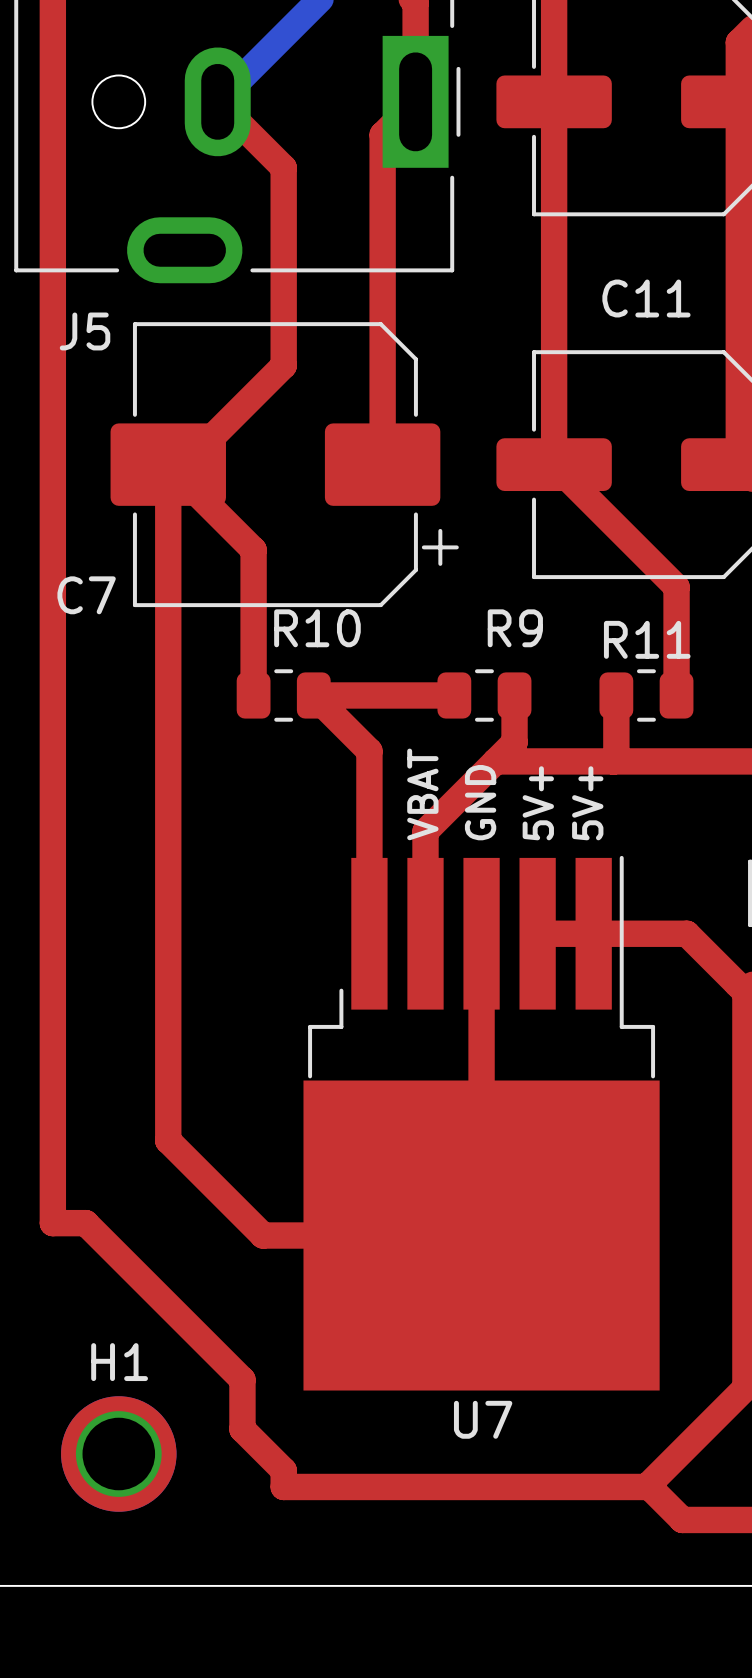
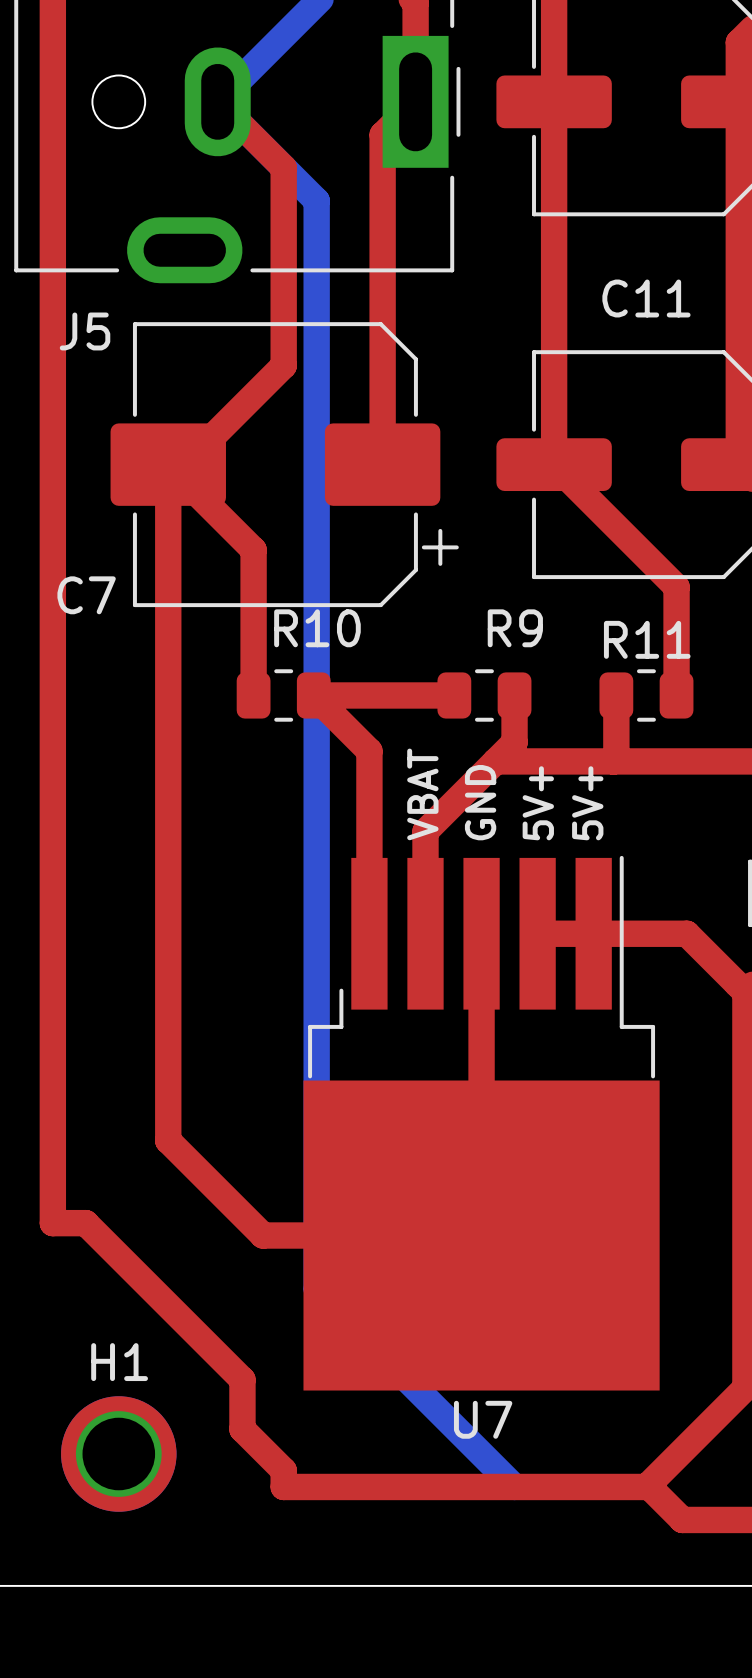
bottom track: none -> (217, 101) (316, 200) (316, 1289) (514, 1486)

